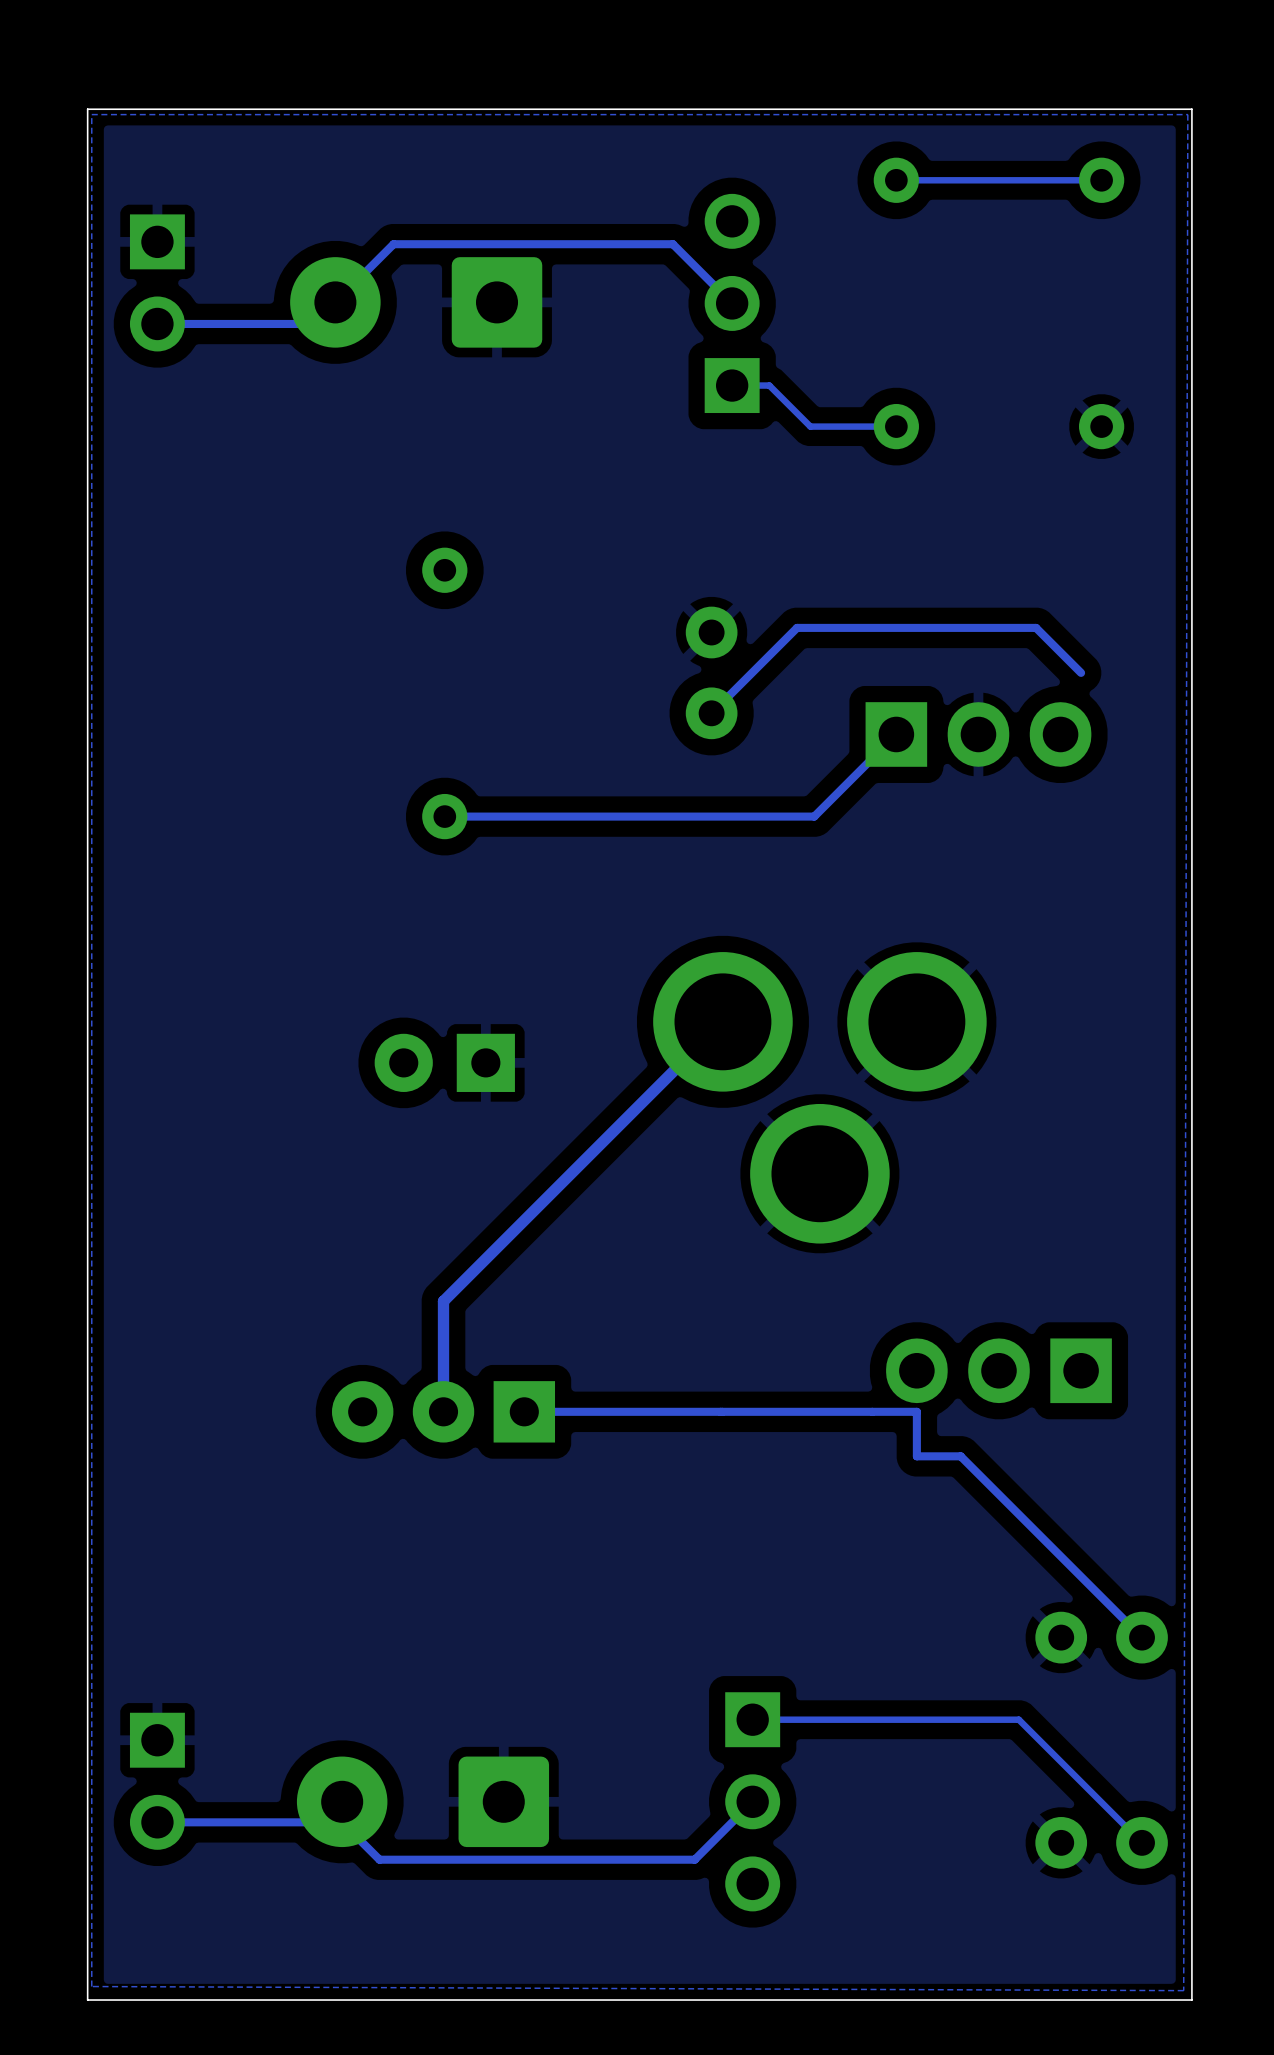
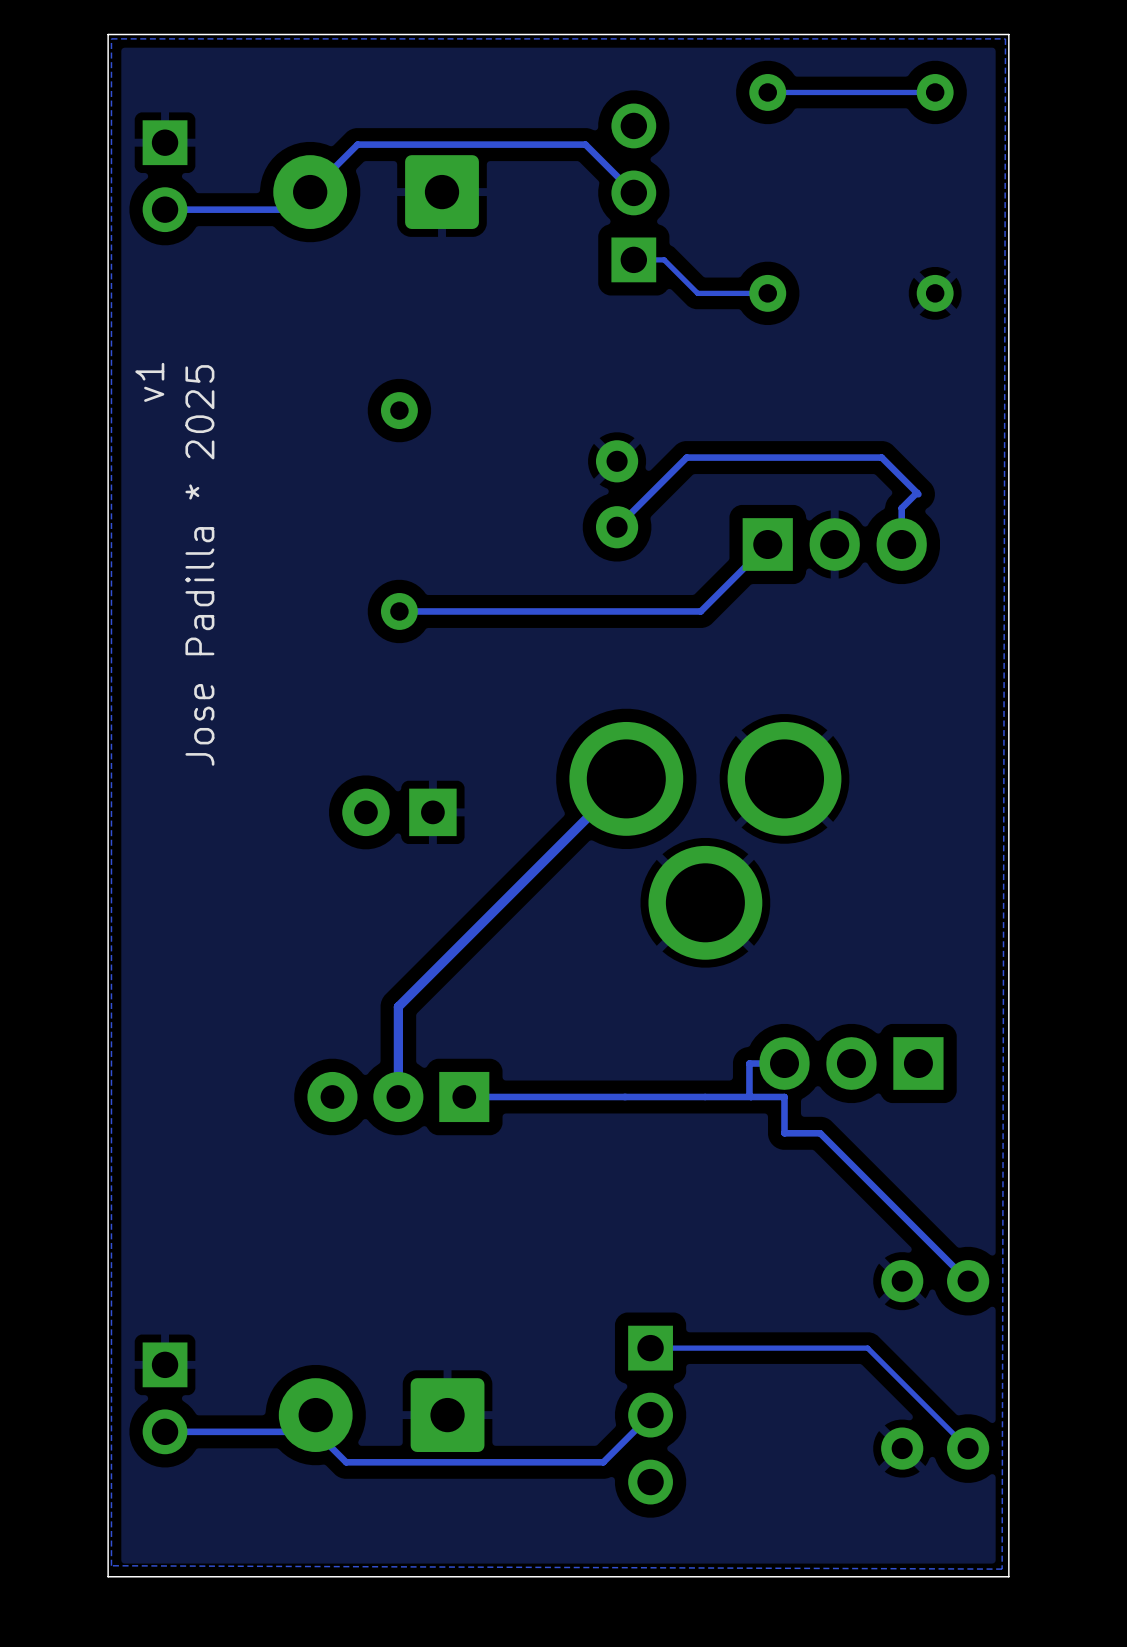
text: none -> v1 (149, 382)
track: (1036, 627) (1079, 671) -> (881, 457) (917, 492) (901, 508) (901, 544)
text: none -> Jose Padilla * 2025 (199, 565)
track: none -> (784, 1063) (749, 1063) (751, 1096)

